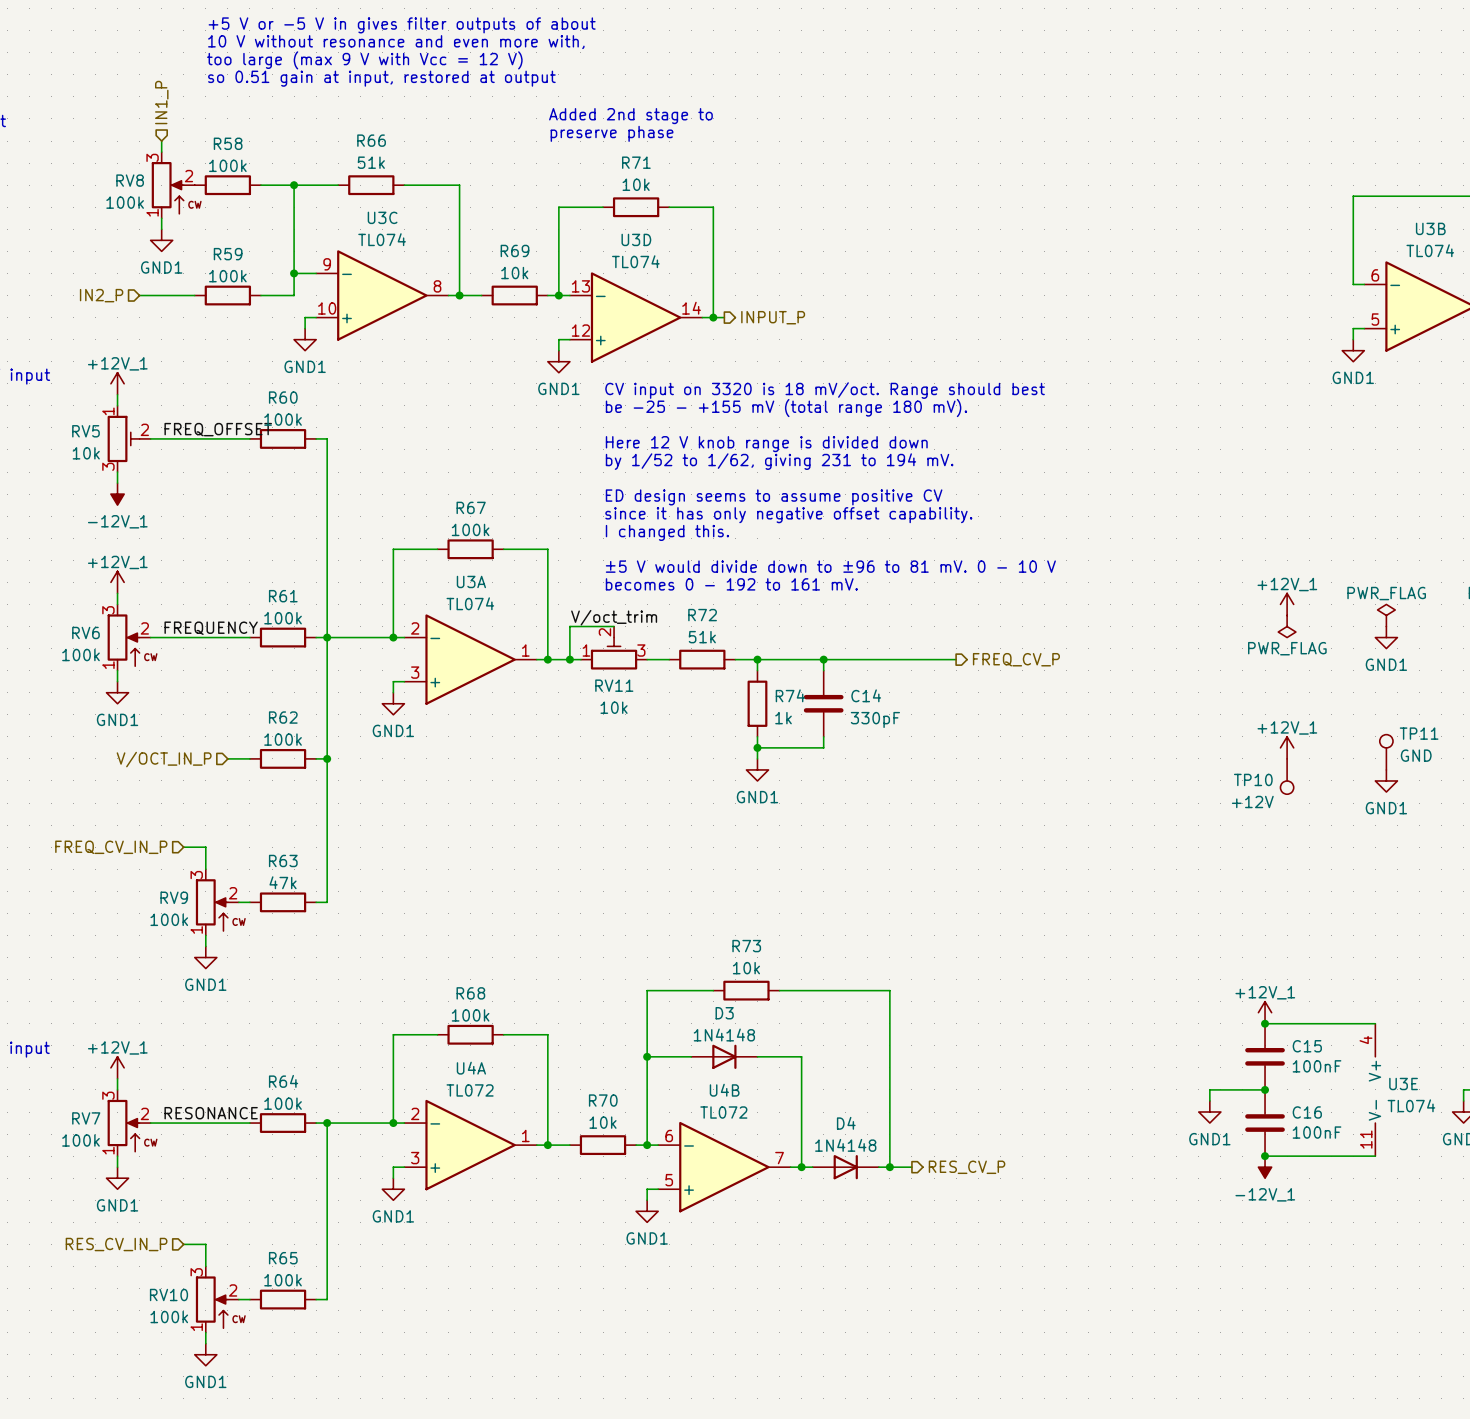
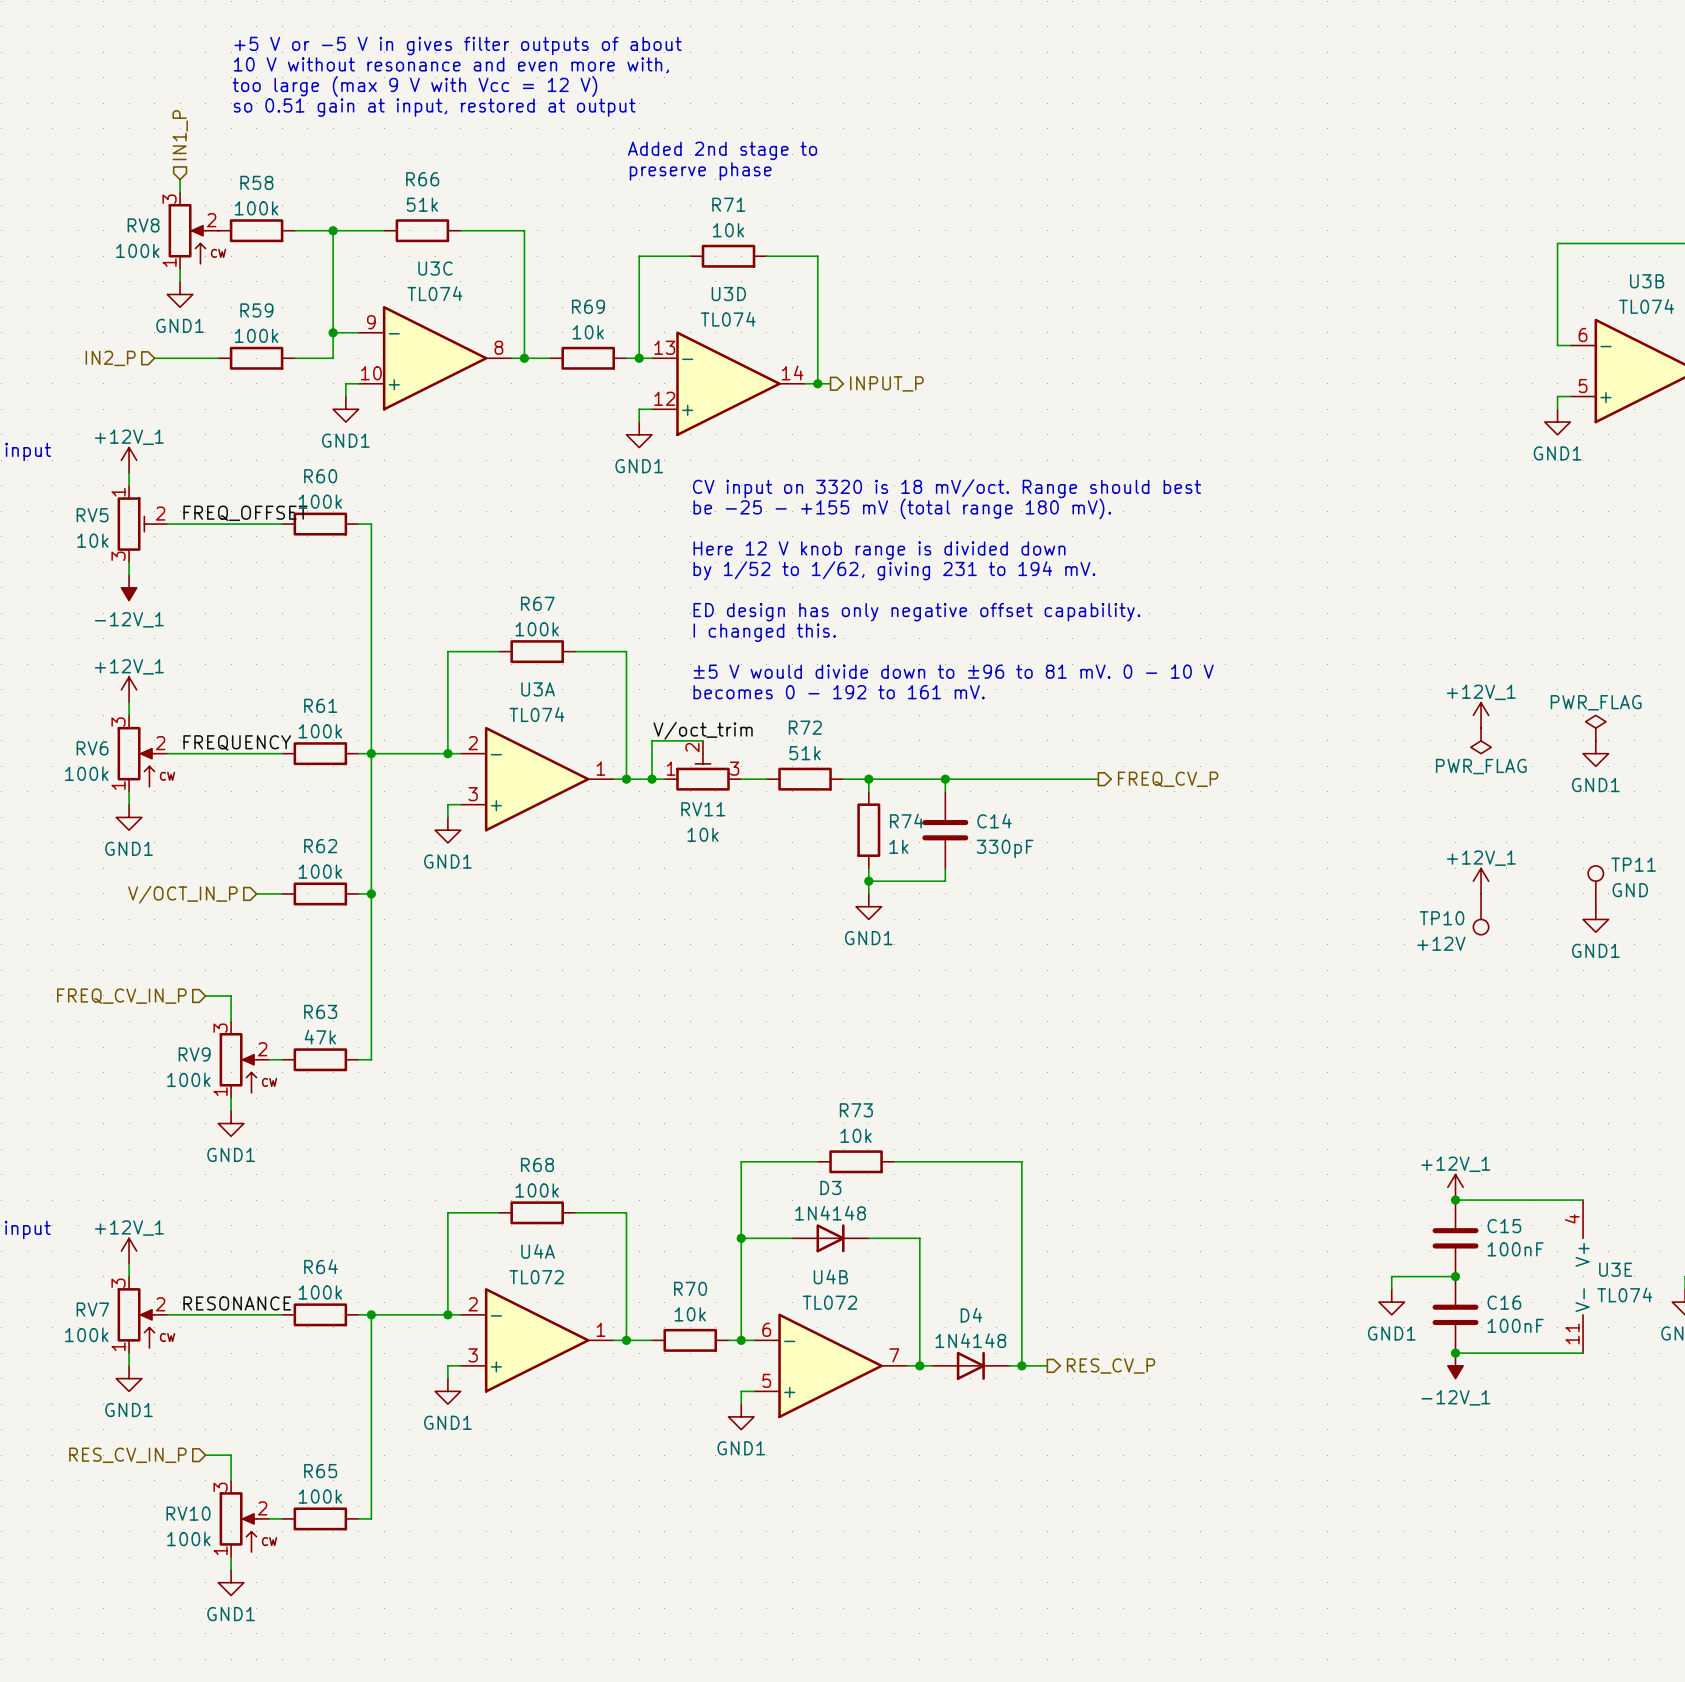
text: CV input on 3320 is 18 mV/oct. Range should best (825, 390) -> none
text: be -25 - +155 mV (total range 180 mV). (786, 408) -> CV input on 3320 is 18 mV/oct. Range should best (946, 488)
text: none -> be -25 - +155 mV (total range 180 mV). (902, 508)
text: Here 12 V knob range is divided down (766, 444) -> none
text: by 1/52 to 1/62, giving 231 to 194 mV. (779, 461) -> Here 12 V knob range is divided down (879, 550)
text: none -> by 1/52 to 1/62, giving 231 to 194 mV. (894, 570)
text: ED design seems to assume positive CV (774, 497) -> none
text: since it has only negative offset capability. (788, 515) -> ED design has only negative offset capability. (916, 612)

